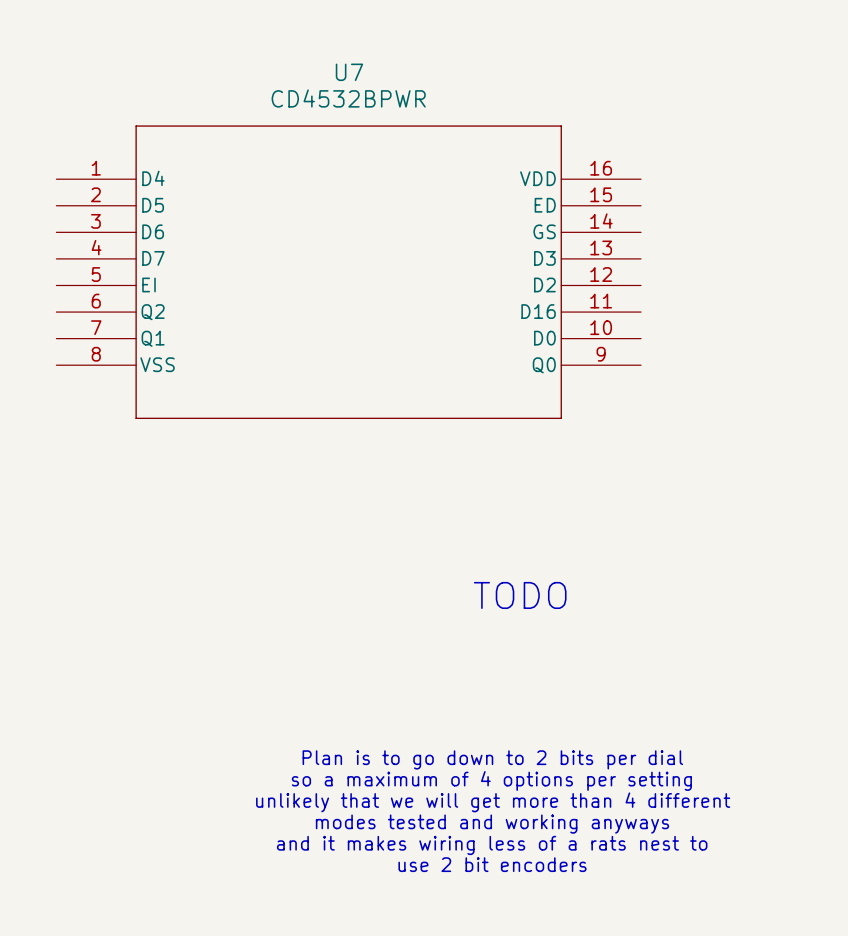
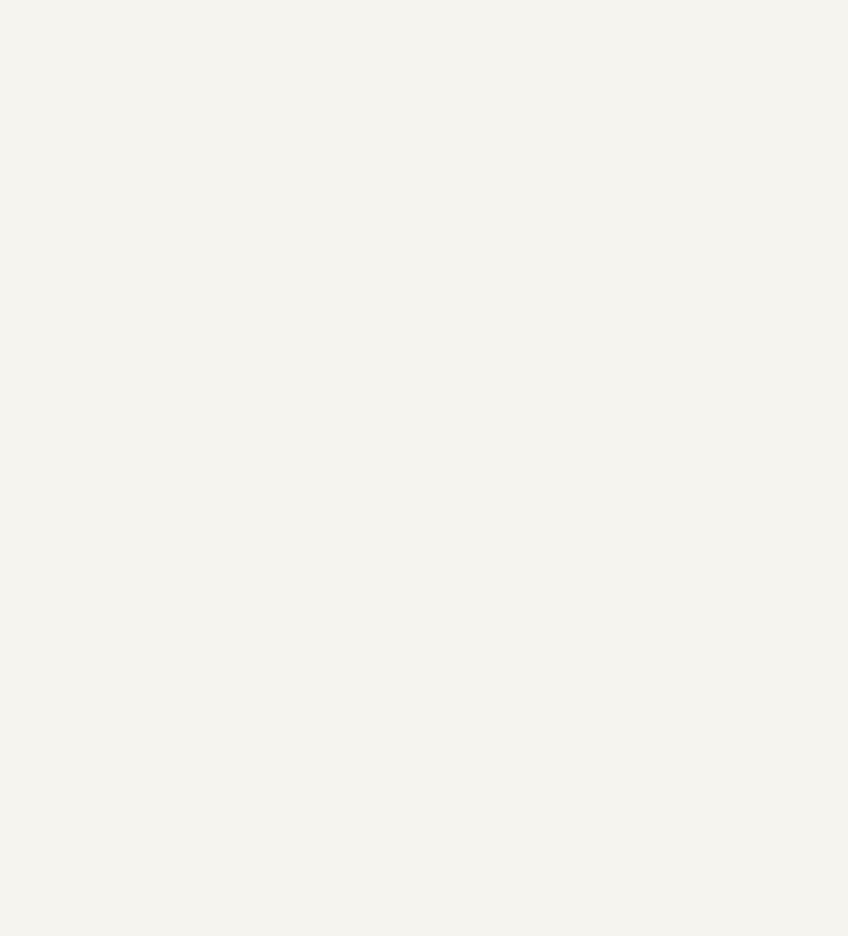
U7: CD4532BPWR (348, 272) -> none
text: TODO (520, 595) -> none
text: Plan is to go down to 2 bits per dial (492, 759) -> none
text: so a maximum of 4 options per setting (491, 780) -> none
text: unlikely that we will get more than 4 different (493, 802) -> none
text: modes tested and working anyways (492, 824) -> none
text: and it makes wiring less of a rats nest to (492, 845) -> none
text: use 2 bit encoders (492, 864) -> none

